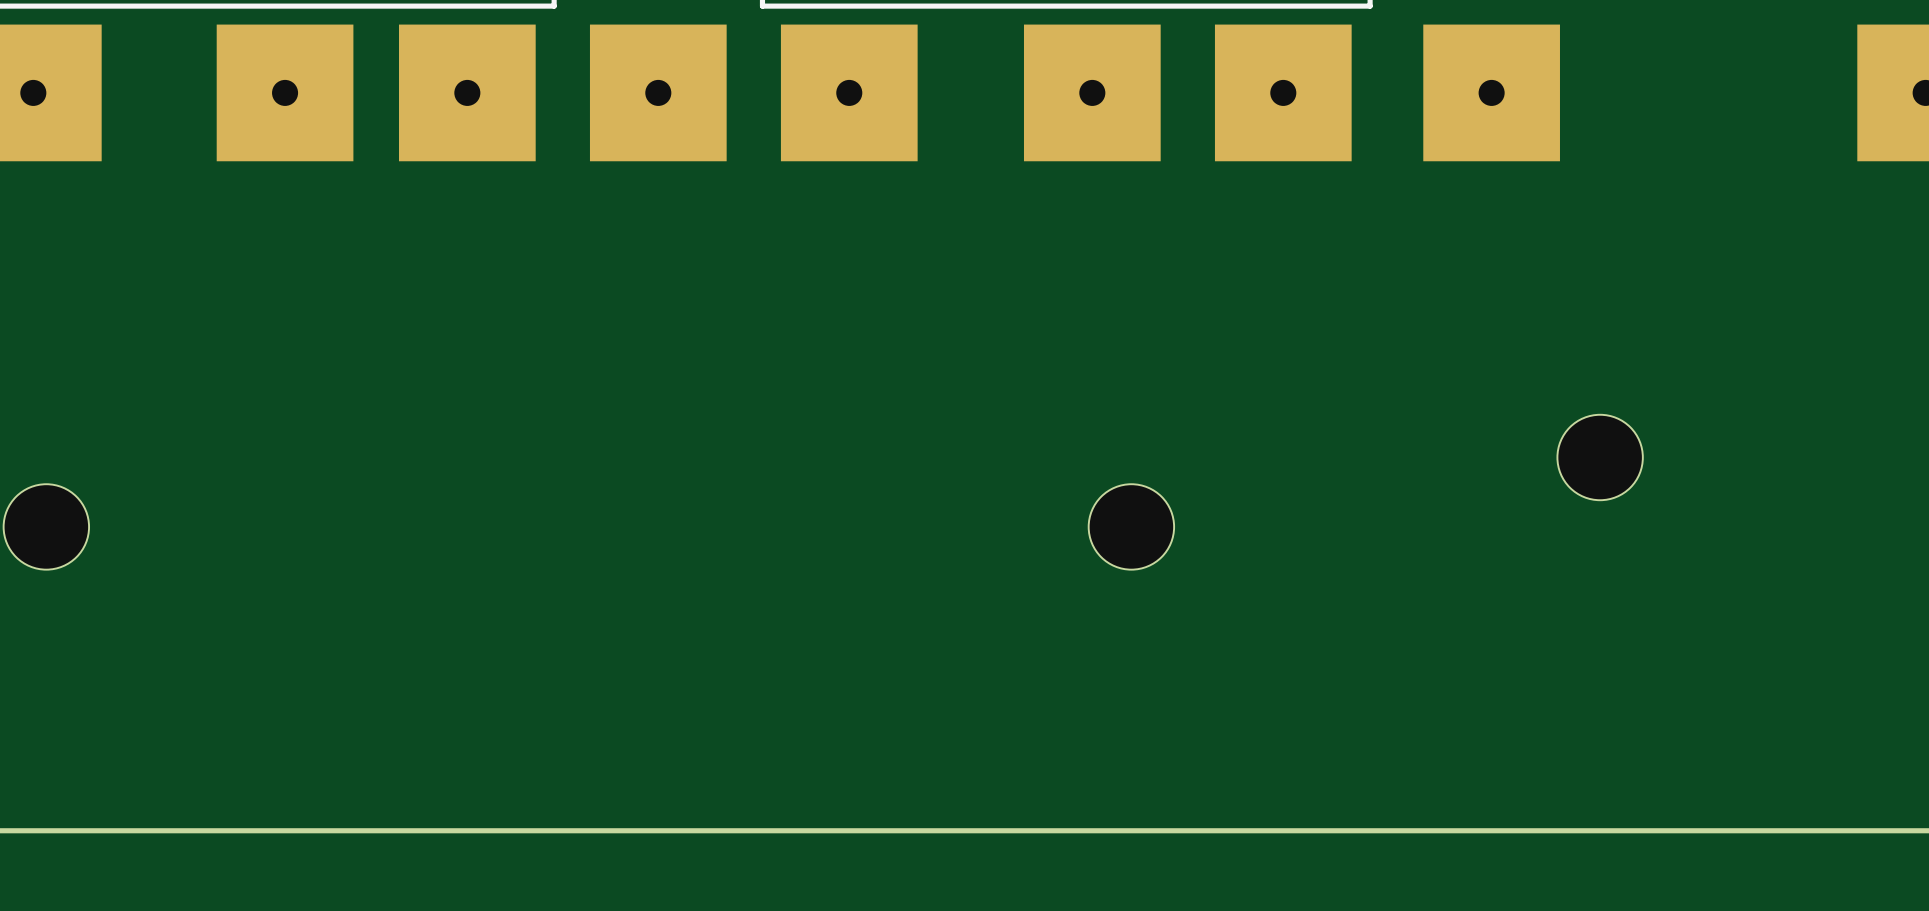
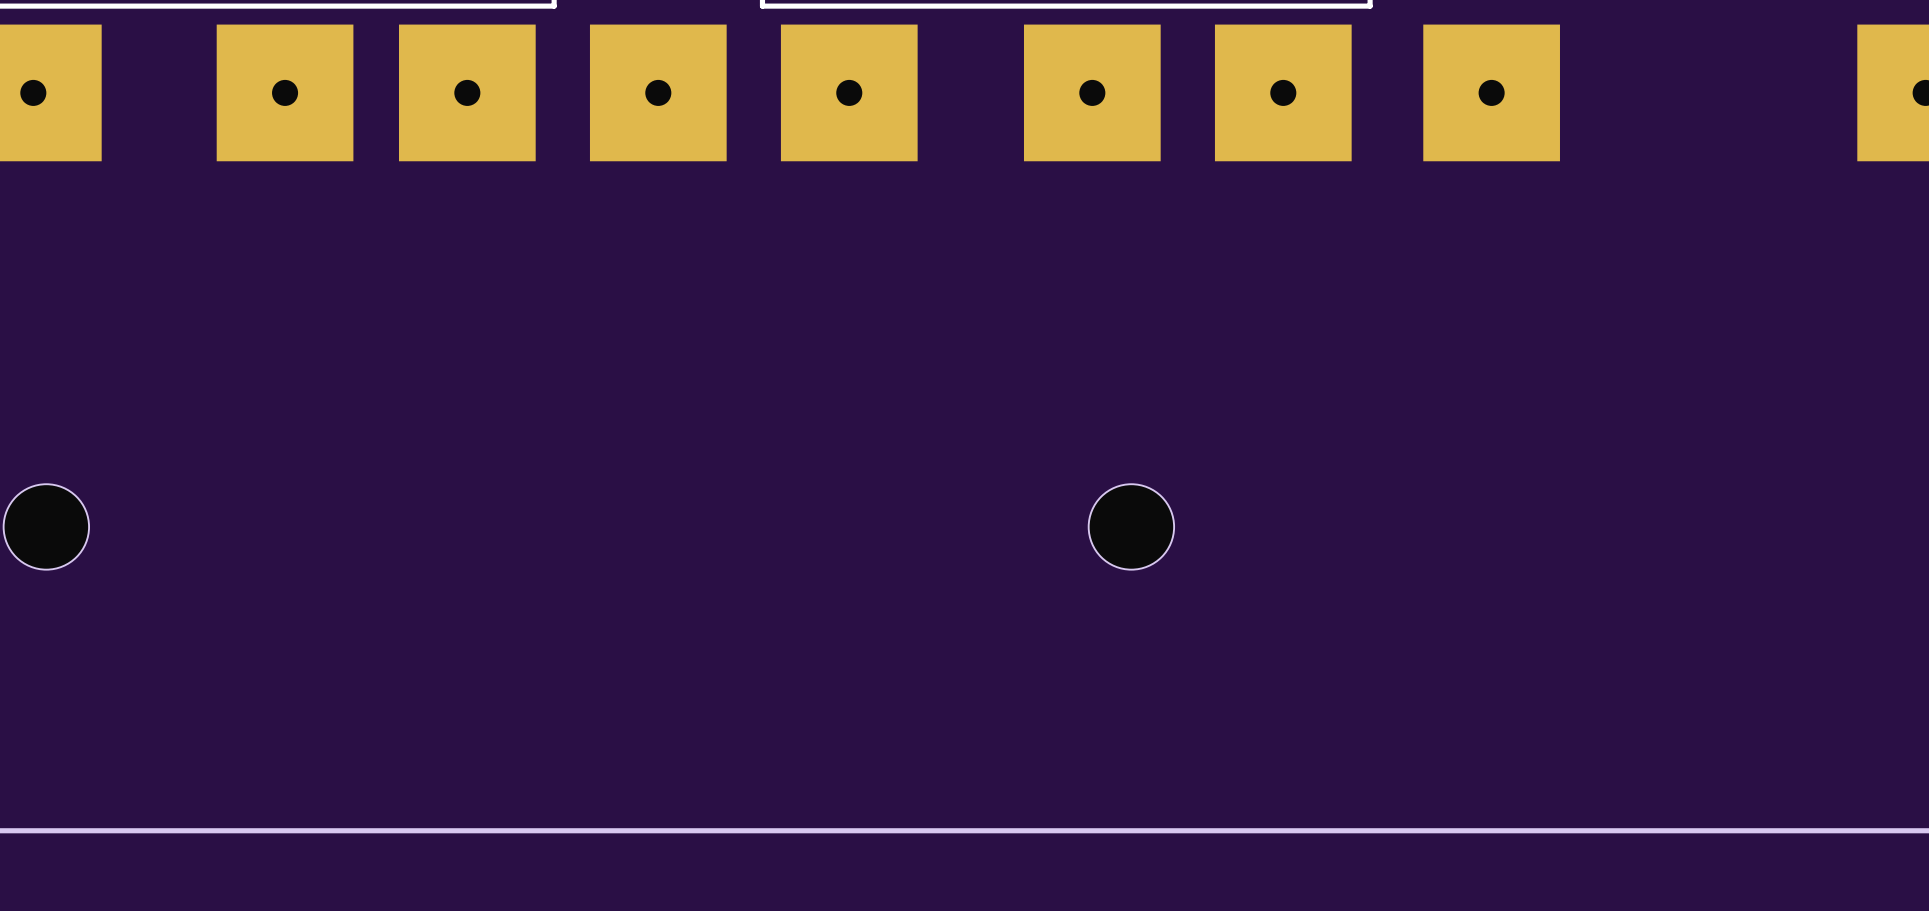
part: (1600, 457) -> none

